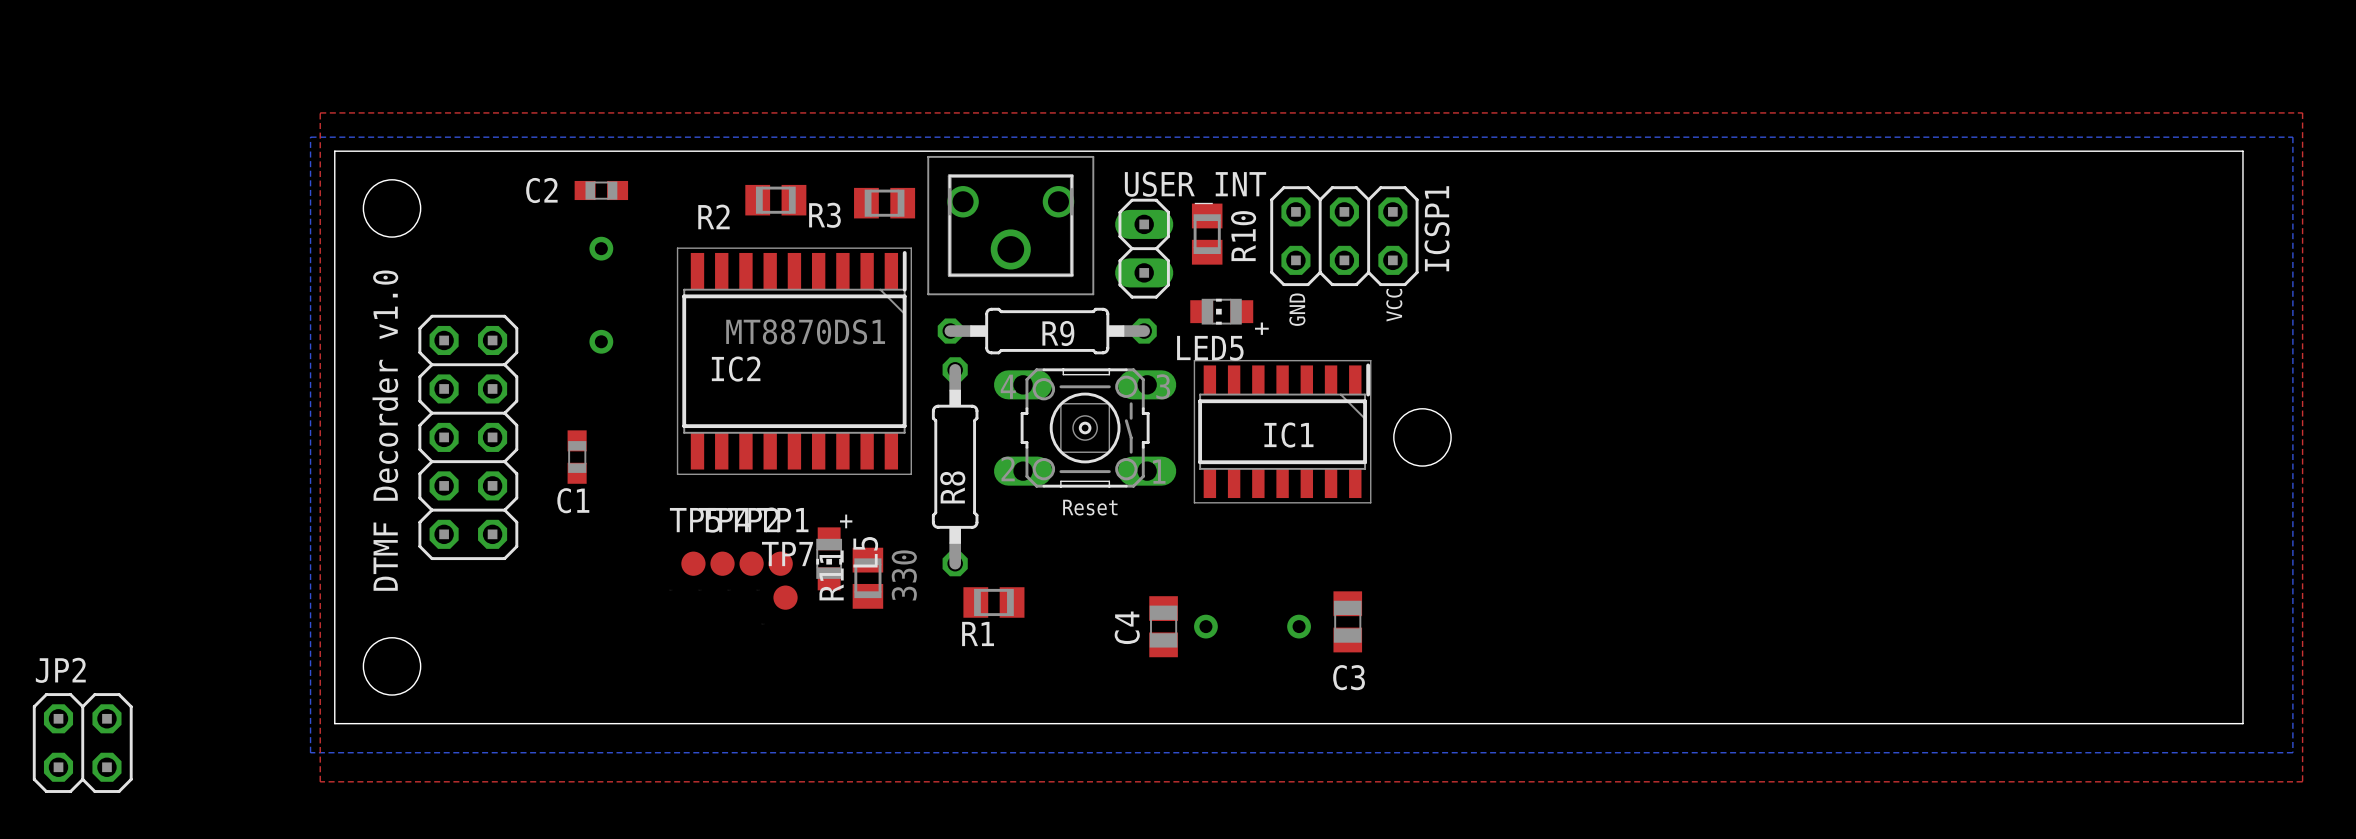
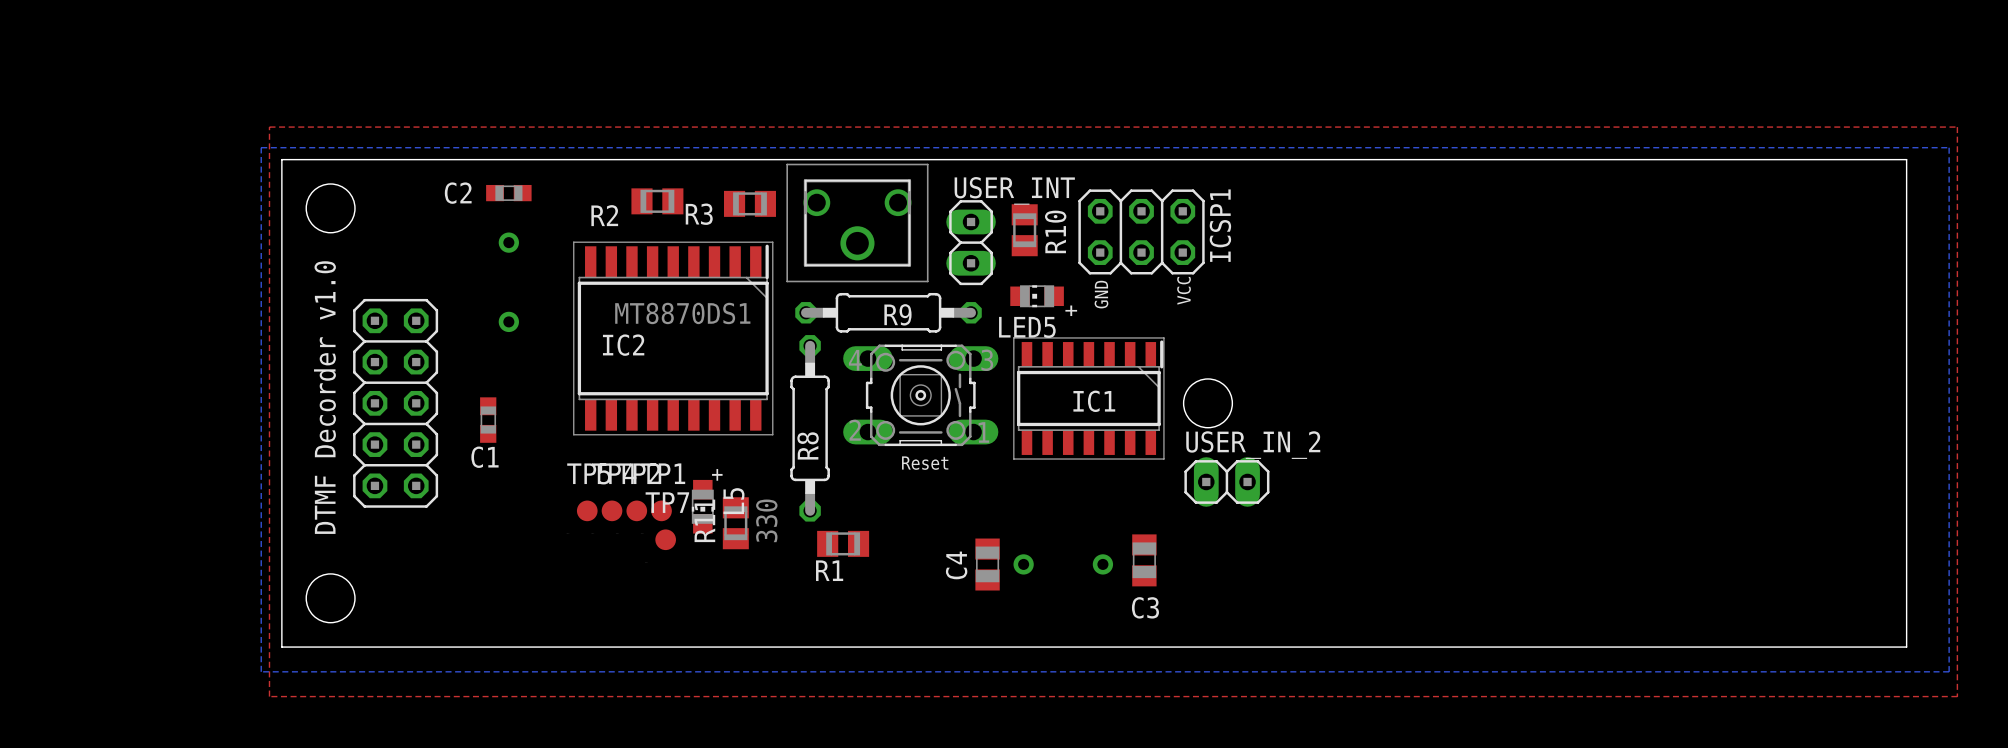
USER_IN_2: none -> (1226, 481)
JP2: (82, 743) -> none

